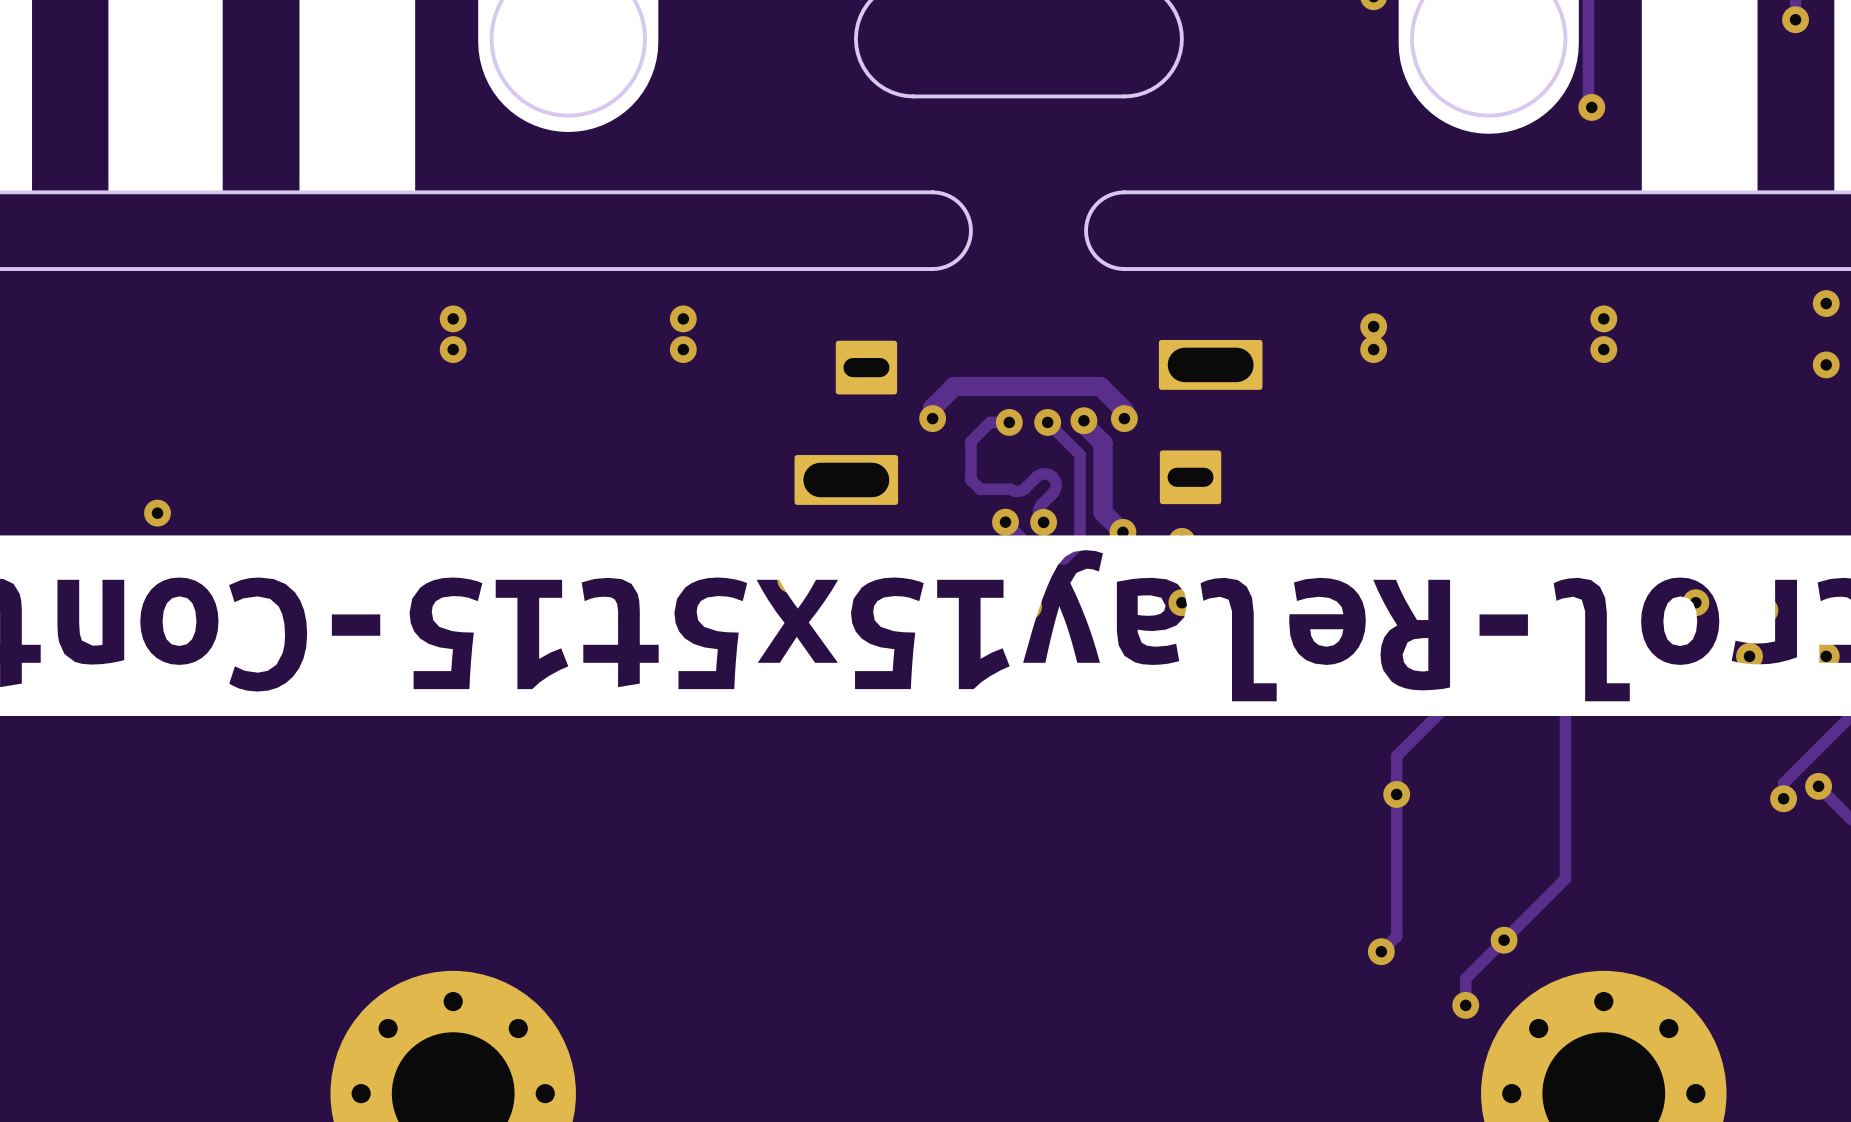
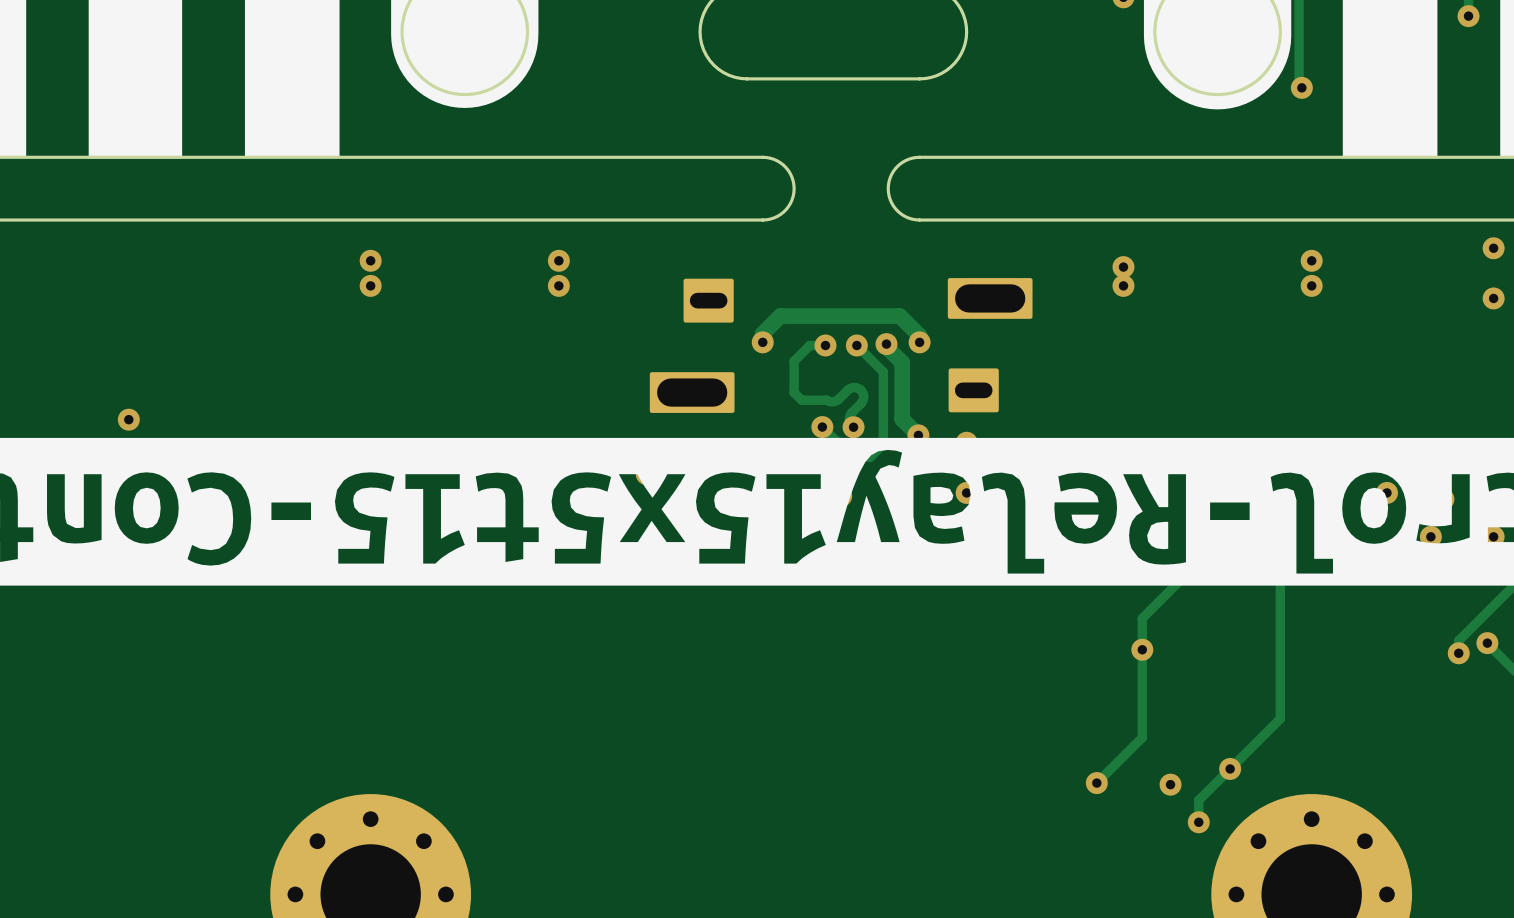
track: (1396, 901) (1396, 936) (1381, 951) -> (1142, 737) (1096, 783)
via: (1381, 951) -> none
via: none -> (1096, 783)
via: none -> (1170, 784)

